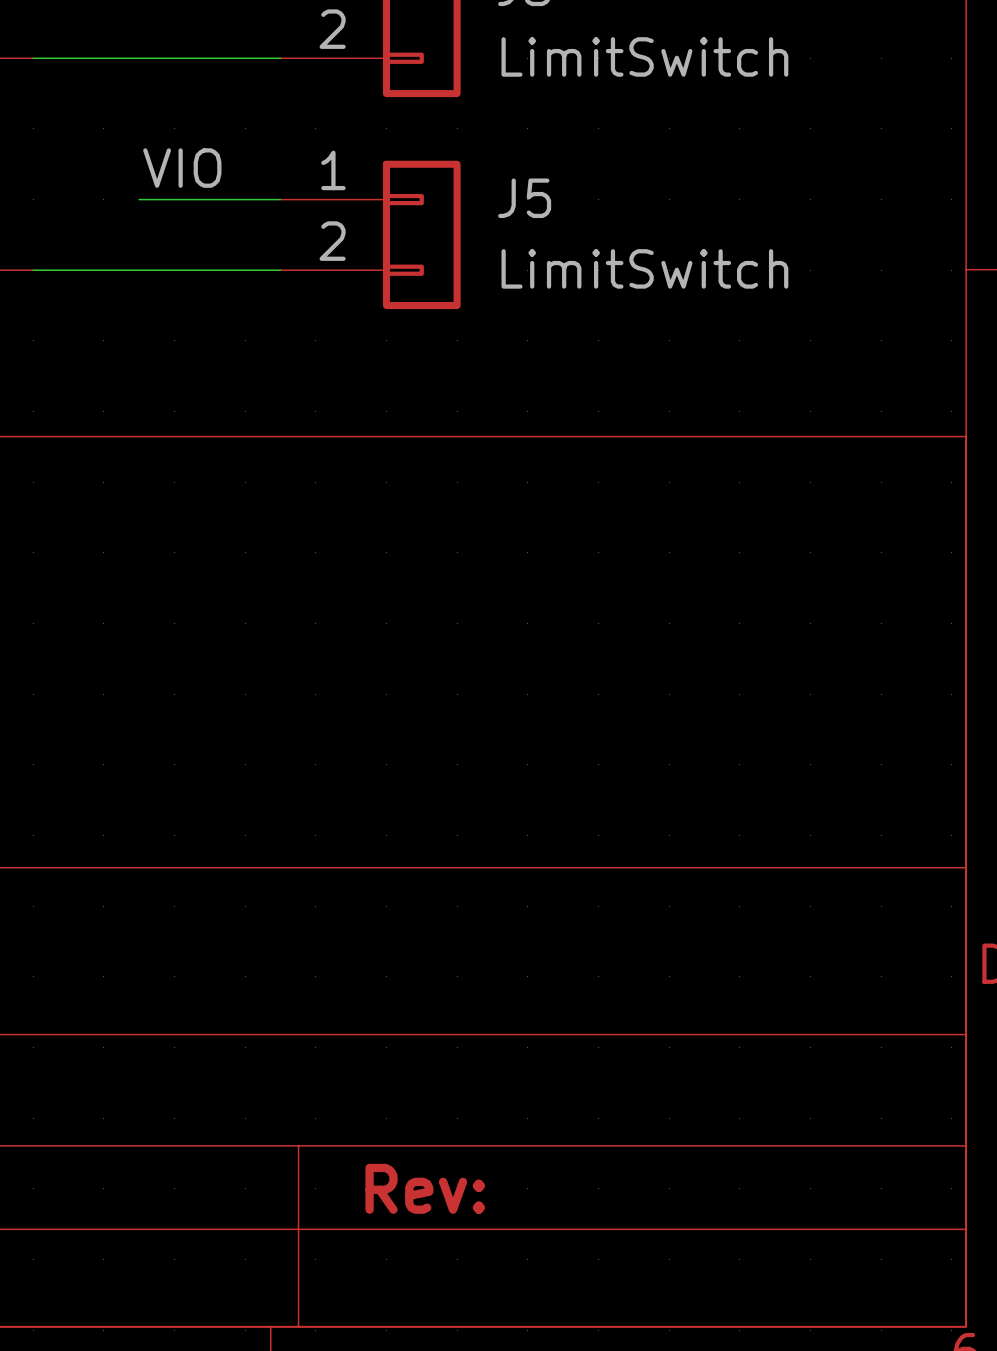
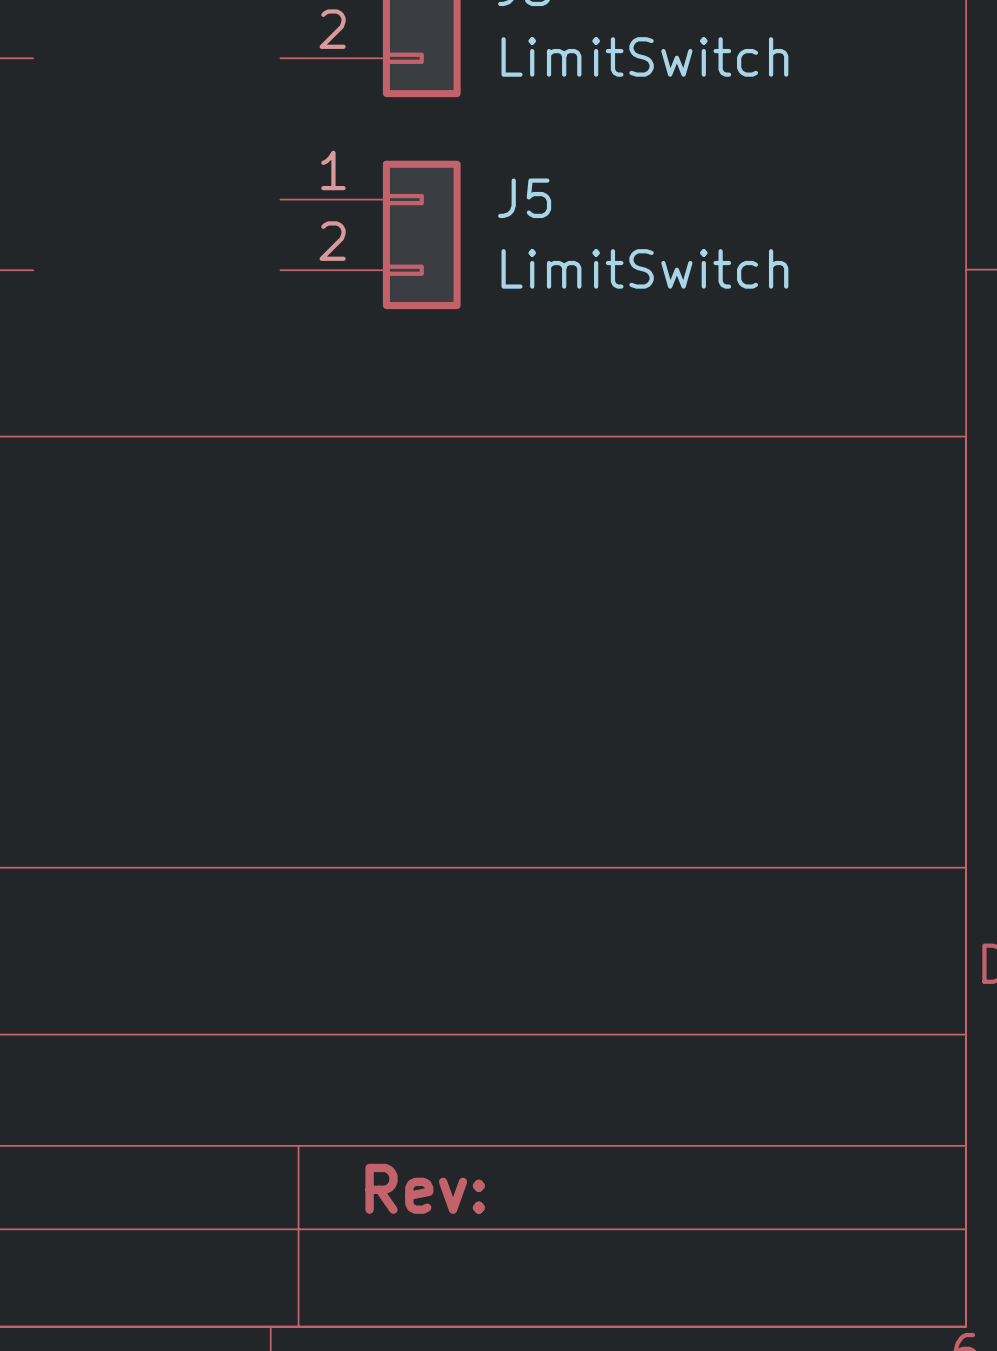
wire: (33, 58) (280, 58) -> none
label: VIO (182, 168) -> none
wire: (139, 199) (280, 199) -> none
wire: (33, 270) (280, 270) -> none

